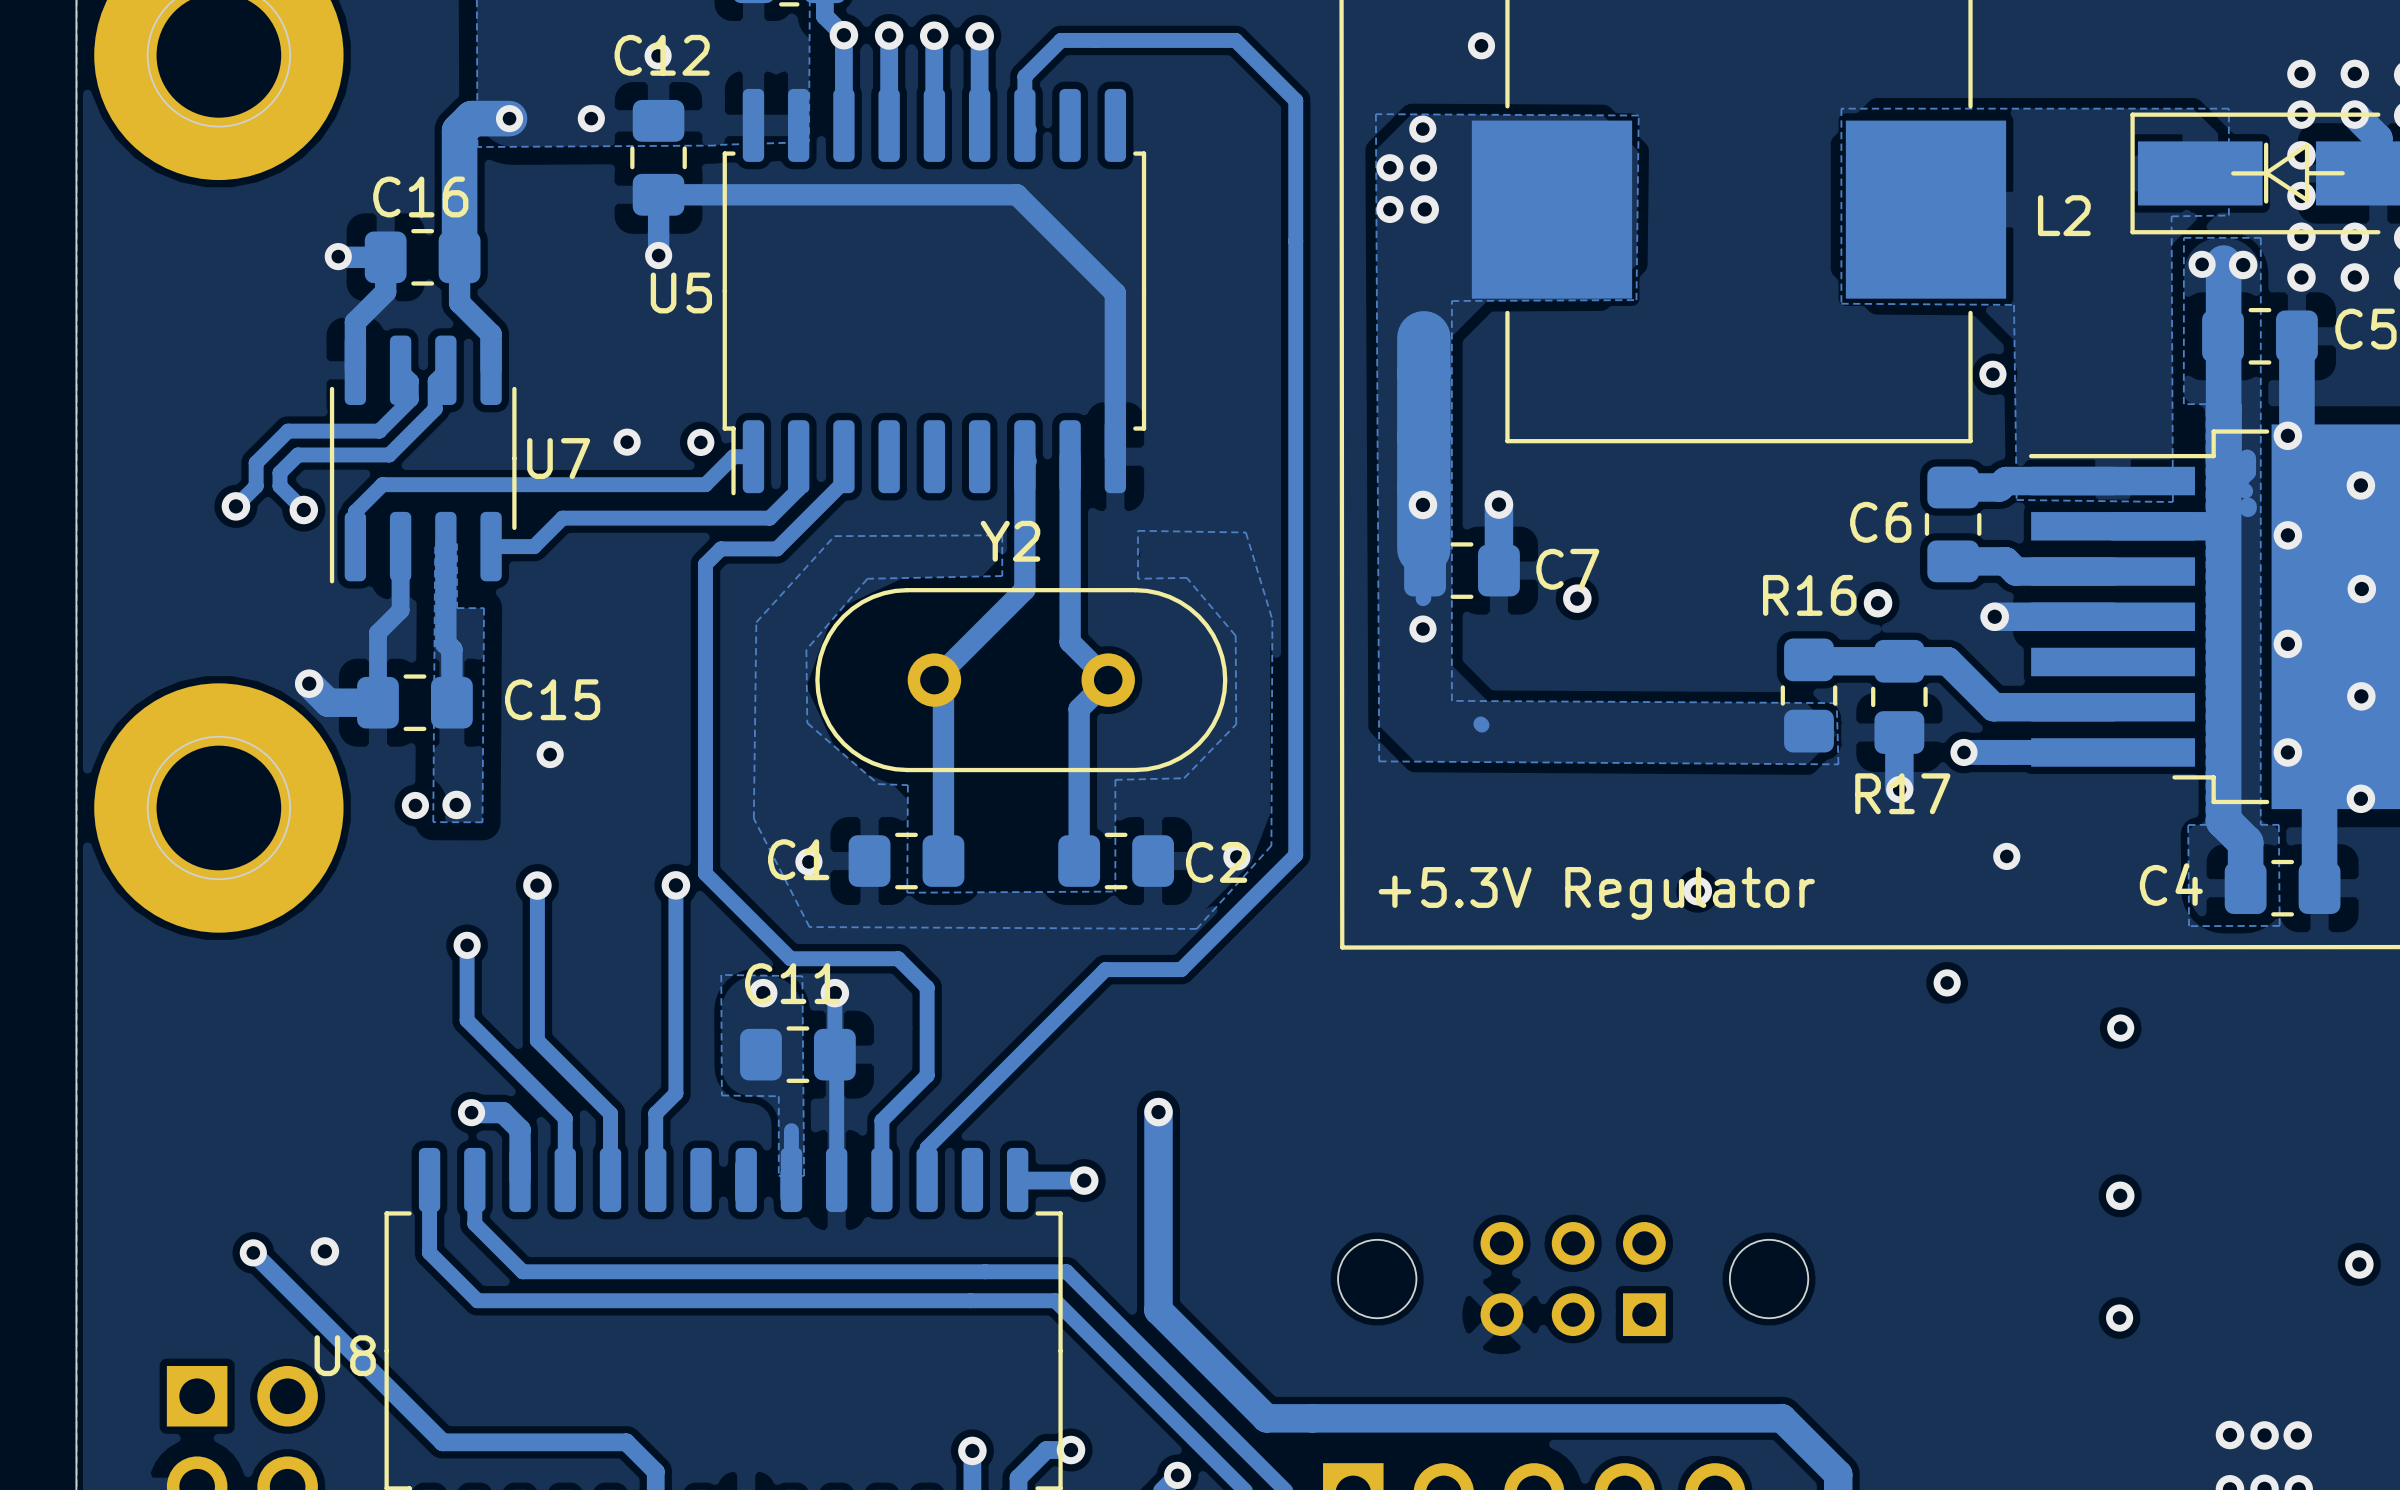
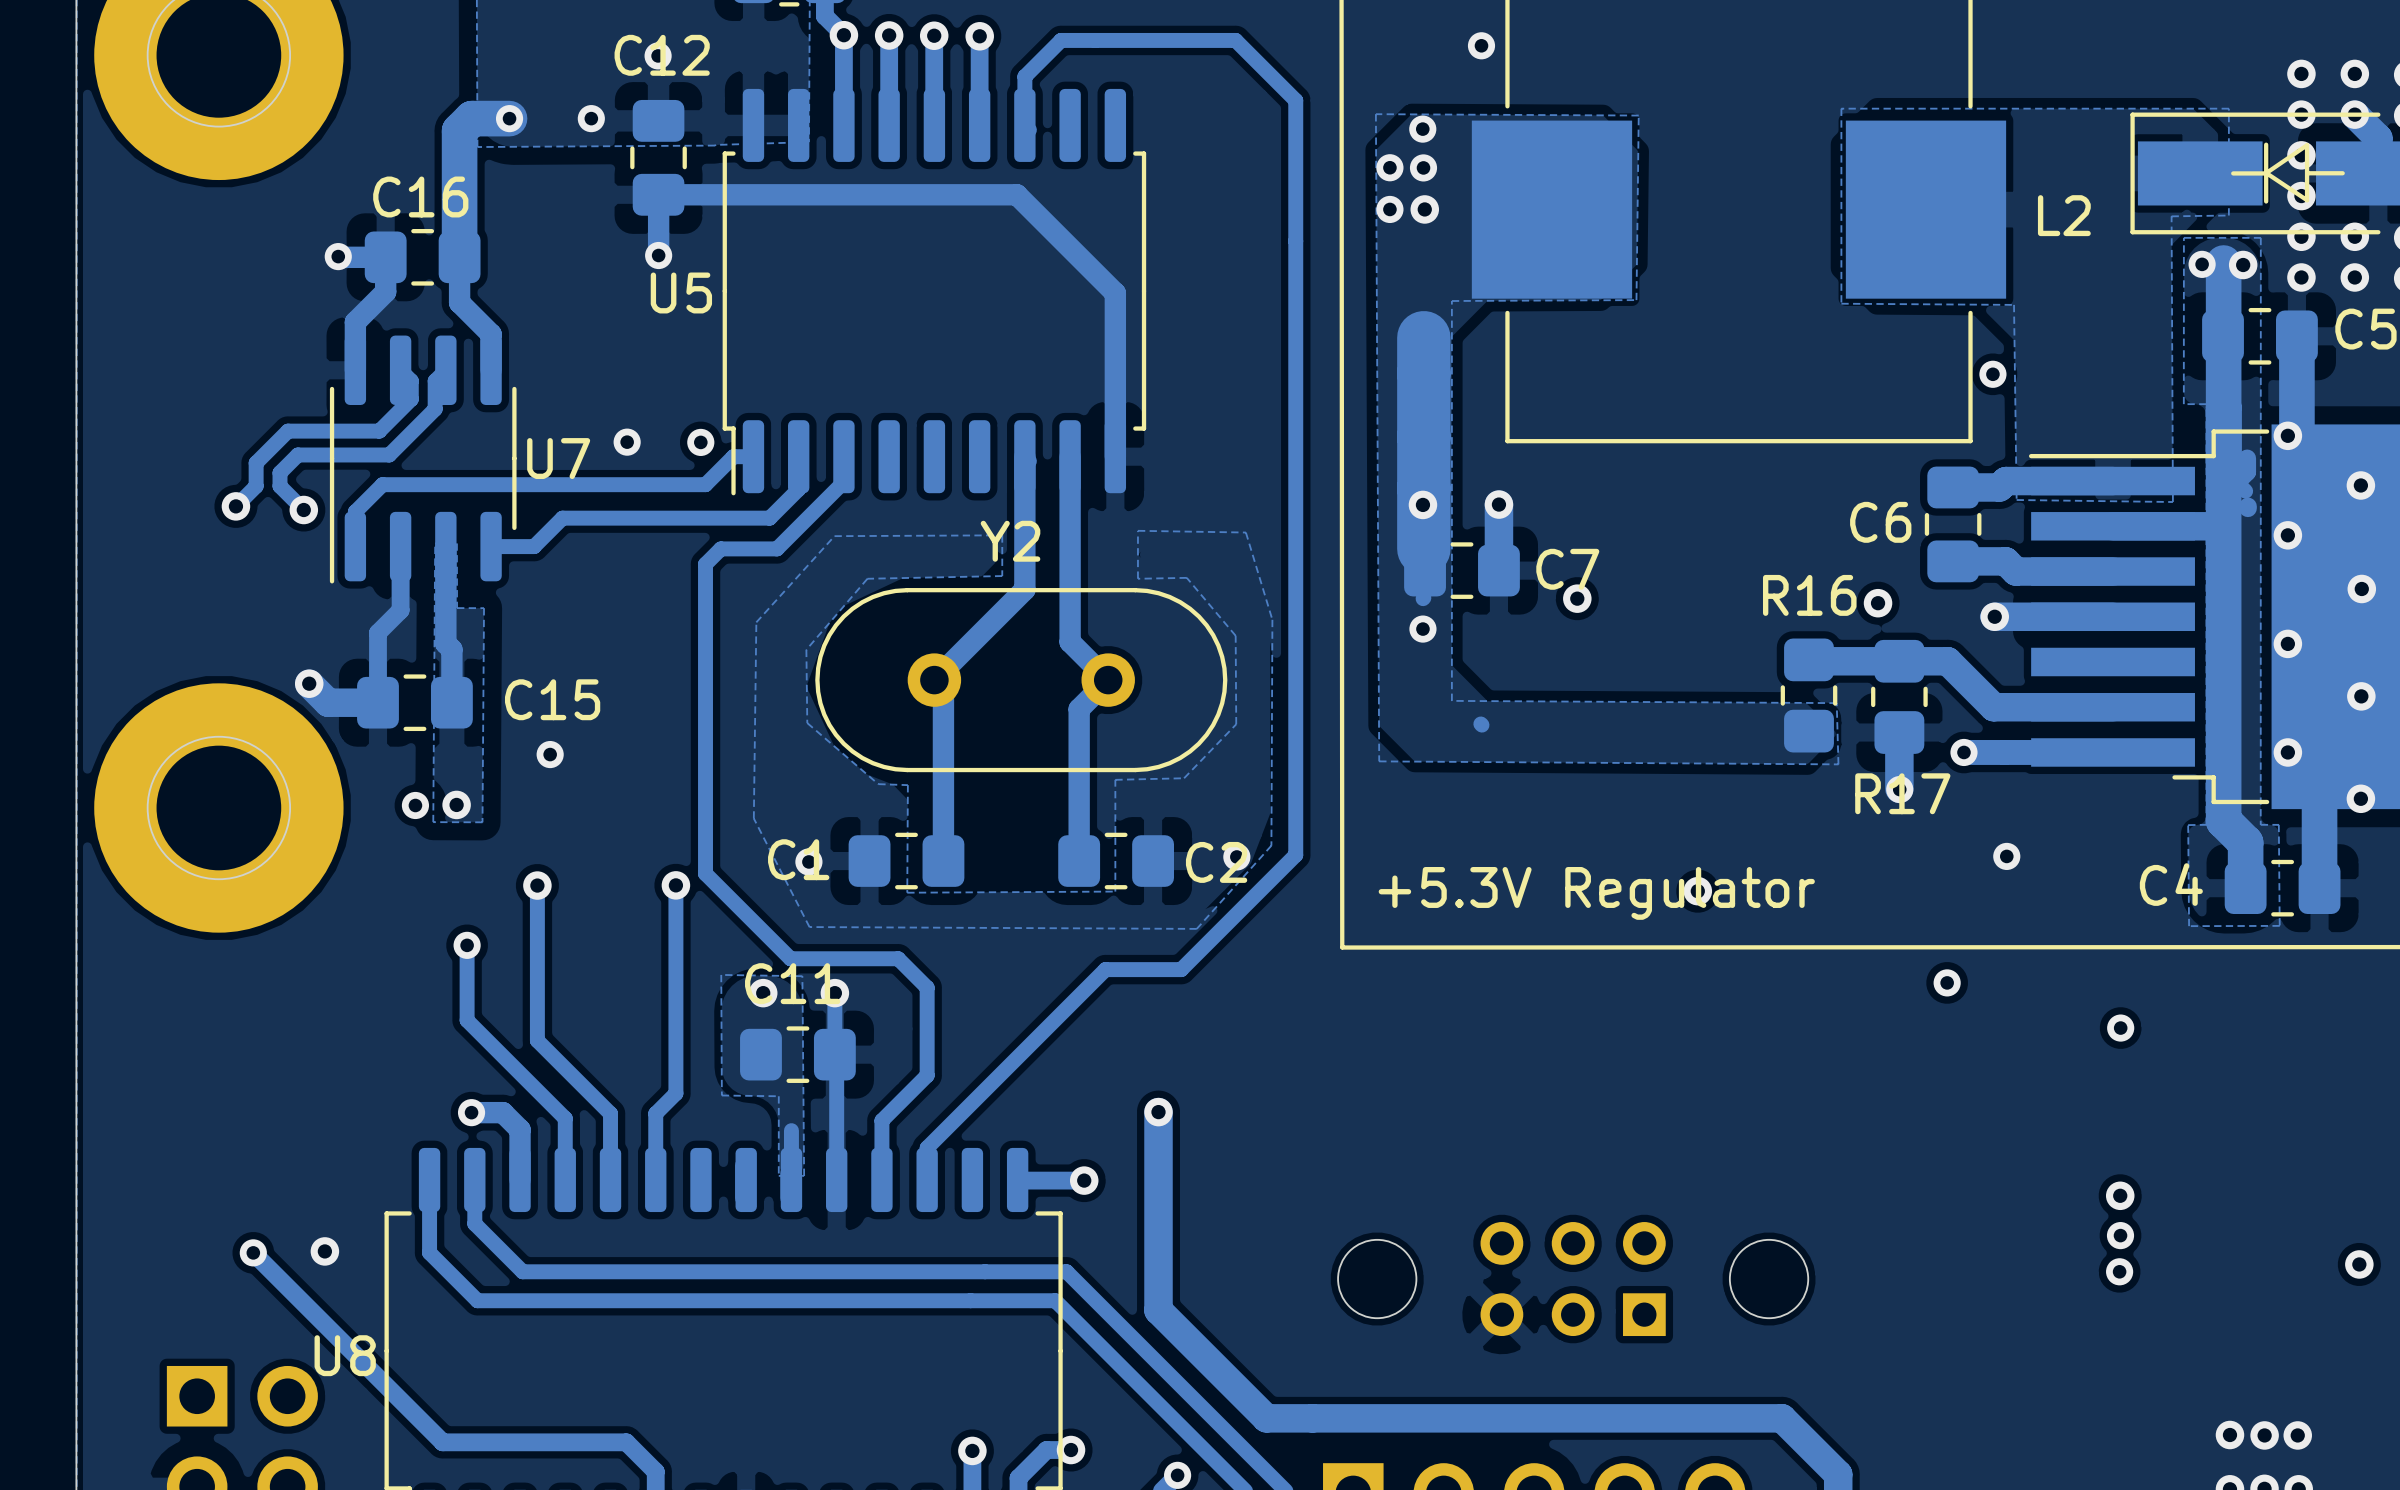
via: none -> (2120, 1235)
via: none -> (2119, 1271)
via: (2119, 1318) -> none

